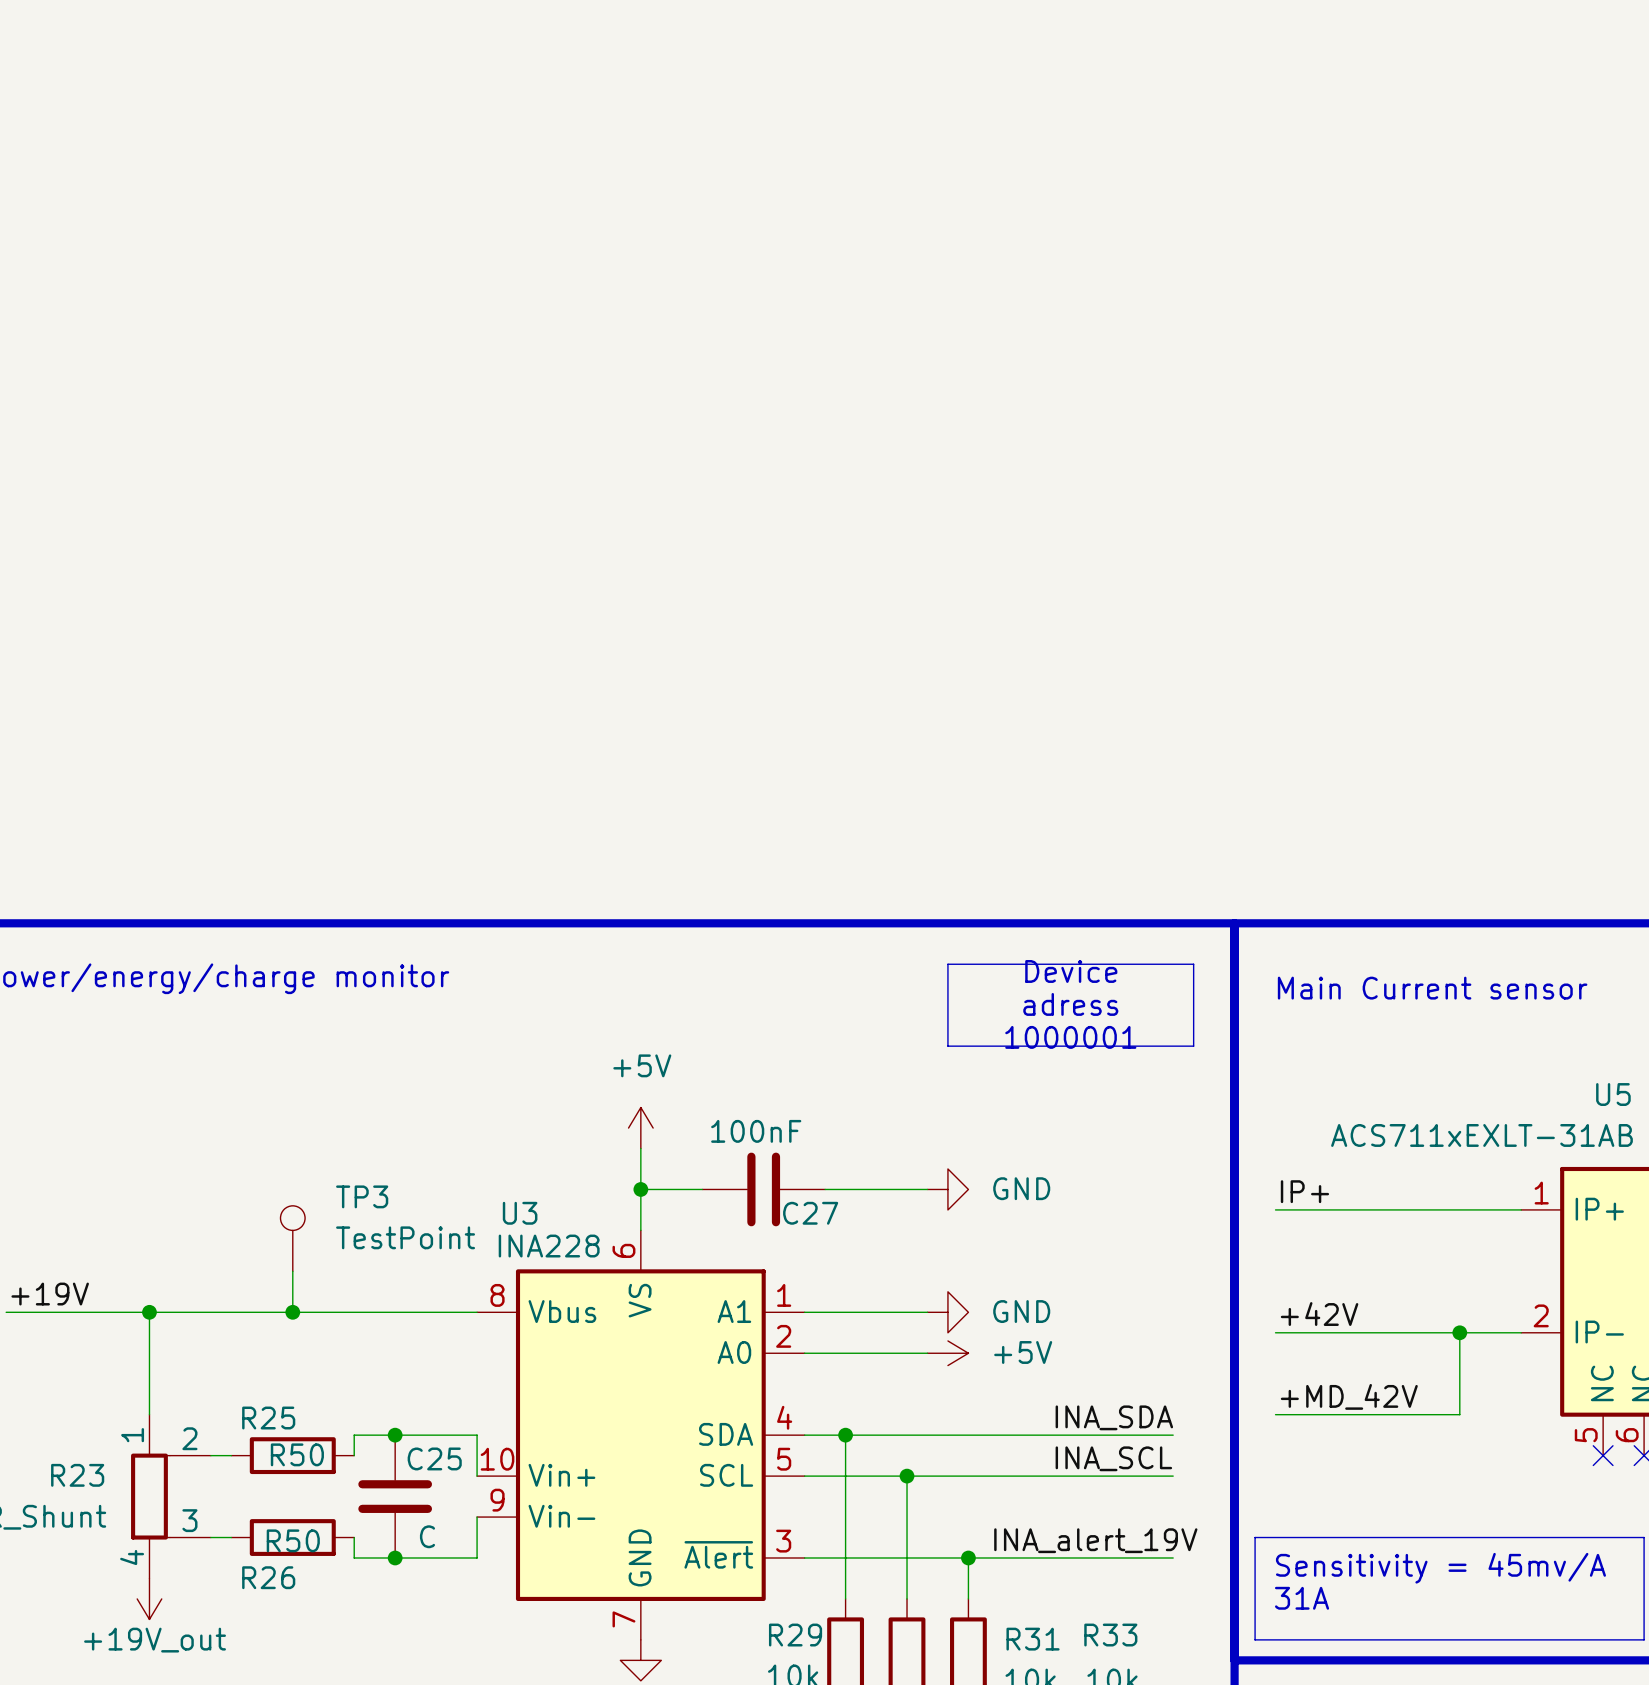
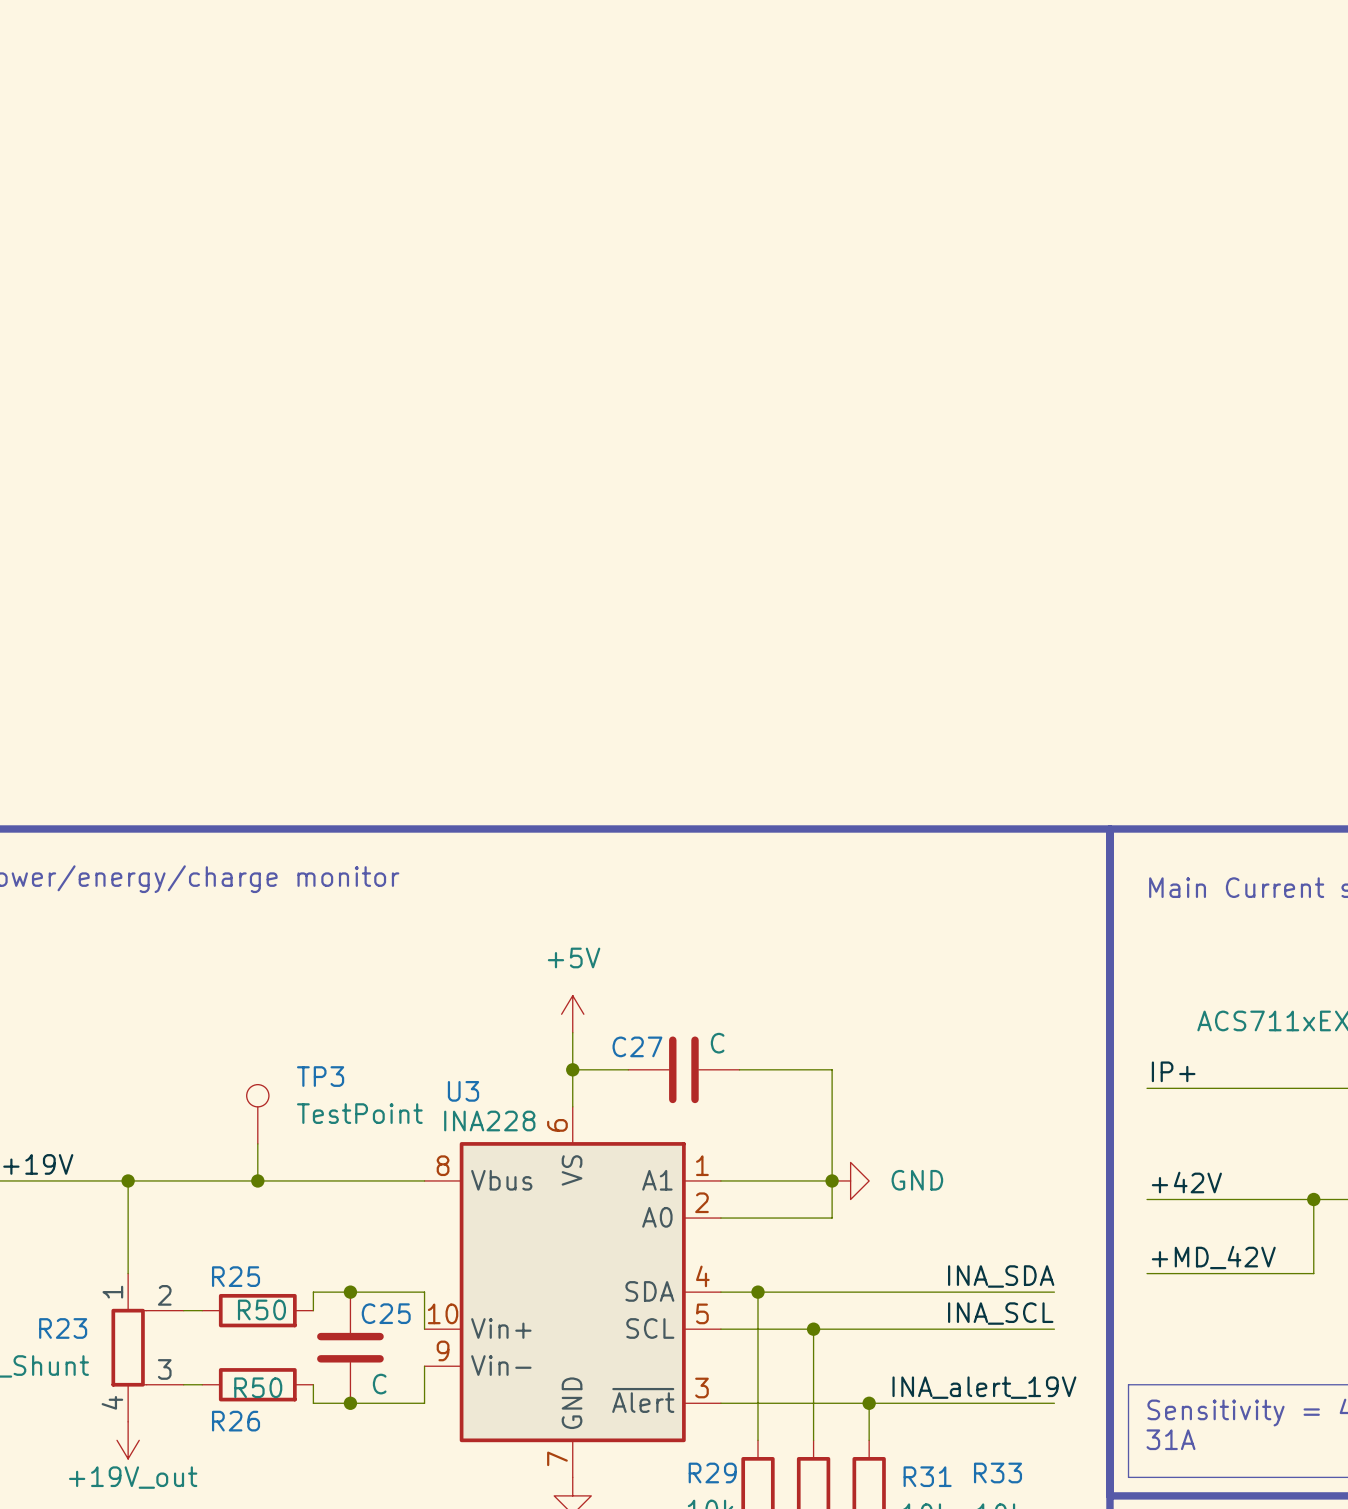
line: (947, 964) (1193, 964) (1193, 1046) (947, 1046) (947, 964) -> none
text: Device (1071, 971) -> none
text: adress (1070, 1004) -> none
text: 1000001 (1070, 1037) -> none
C27 value: 100nF (756, 1131) -> C (717, 1043)
wire: none -> (832, 1069) (832, 1218)
power symbol: GND (947, 1189) -> none
C27 name position: C27 (810, 1213) -> C27 (637, 1046)
junction: none -> (832, 1180)
power symbol: +5V (947, 1353) -> none

